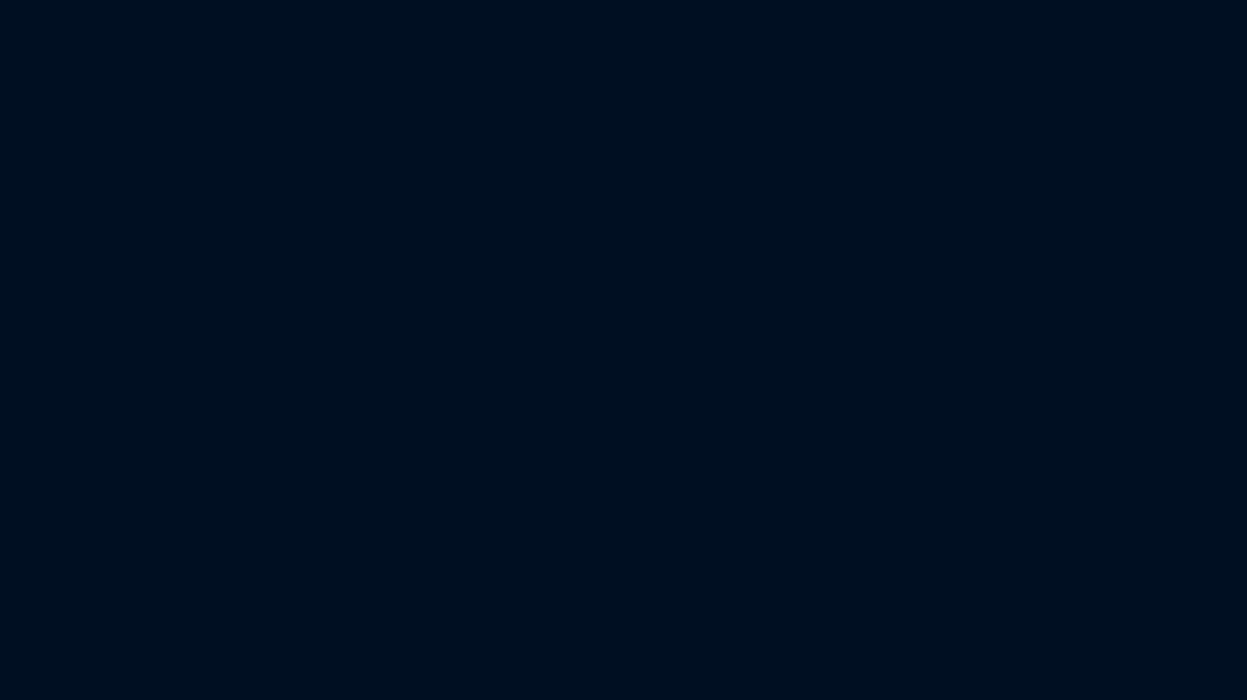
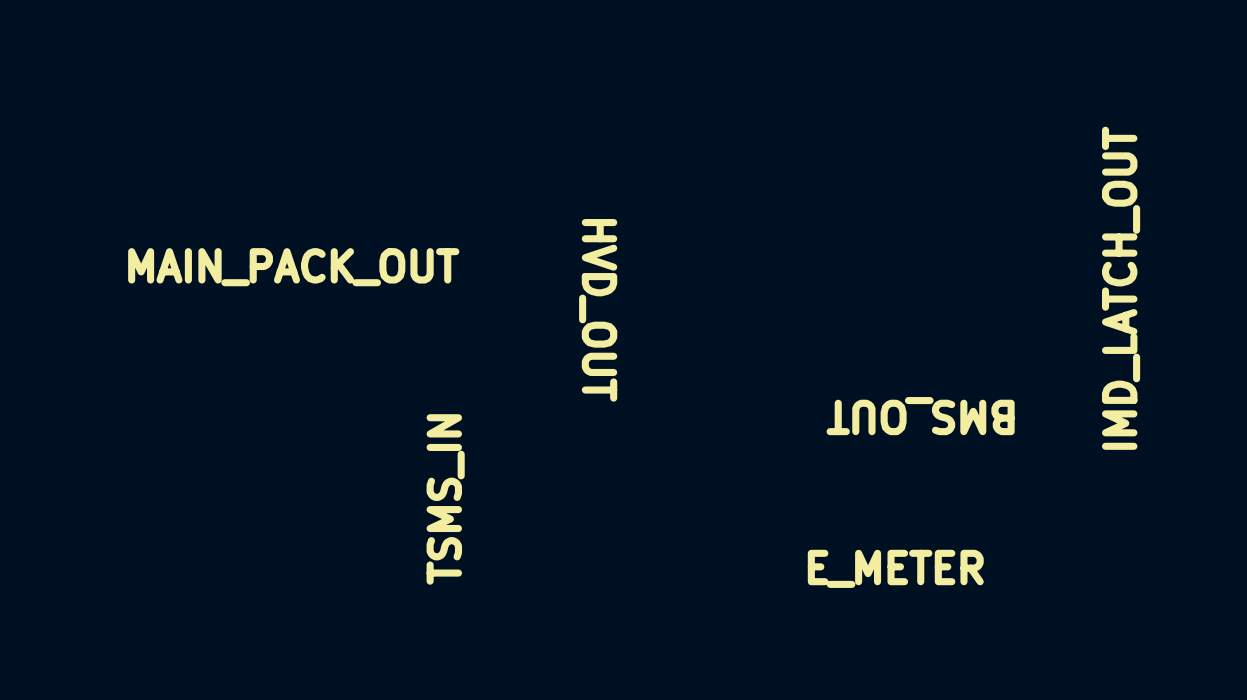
text: none -> MAIN_PACK_OUT (293, 267)
text: none -> IMD_LATCH_OUT (1121, 288)
text: none -> HVD_OUT (598, 310)
text: none -> BMS_OUT (920, 416)
text: none -> TSMS_IN (445, 499)
text: none -> E_METER (895, 568)

